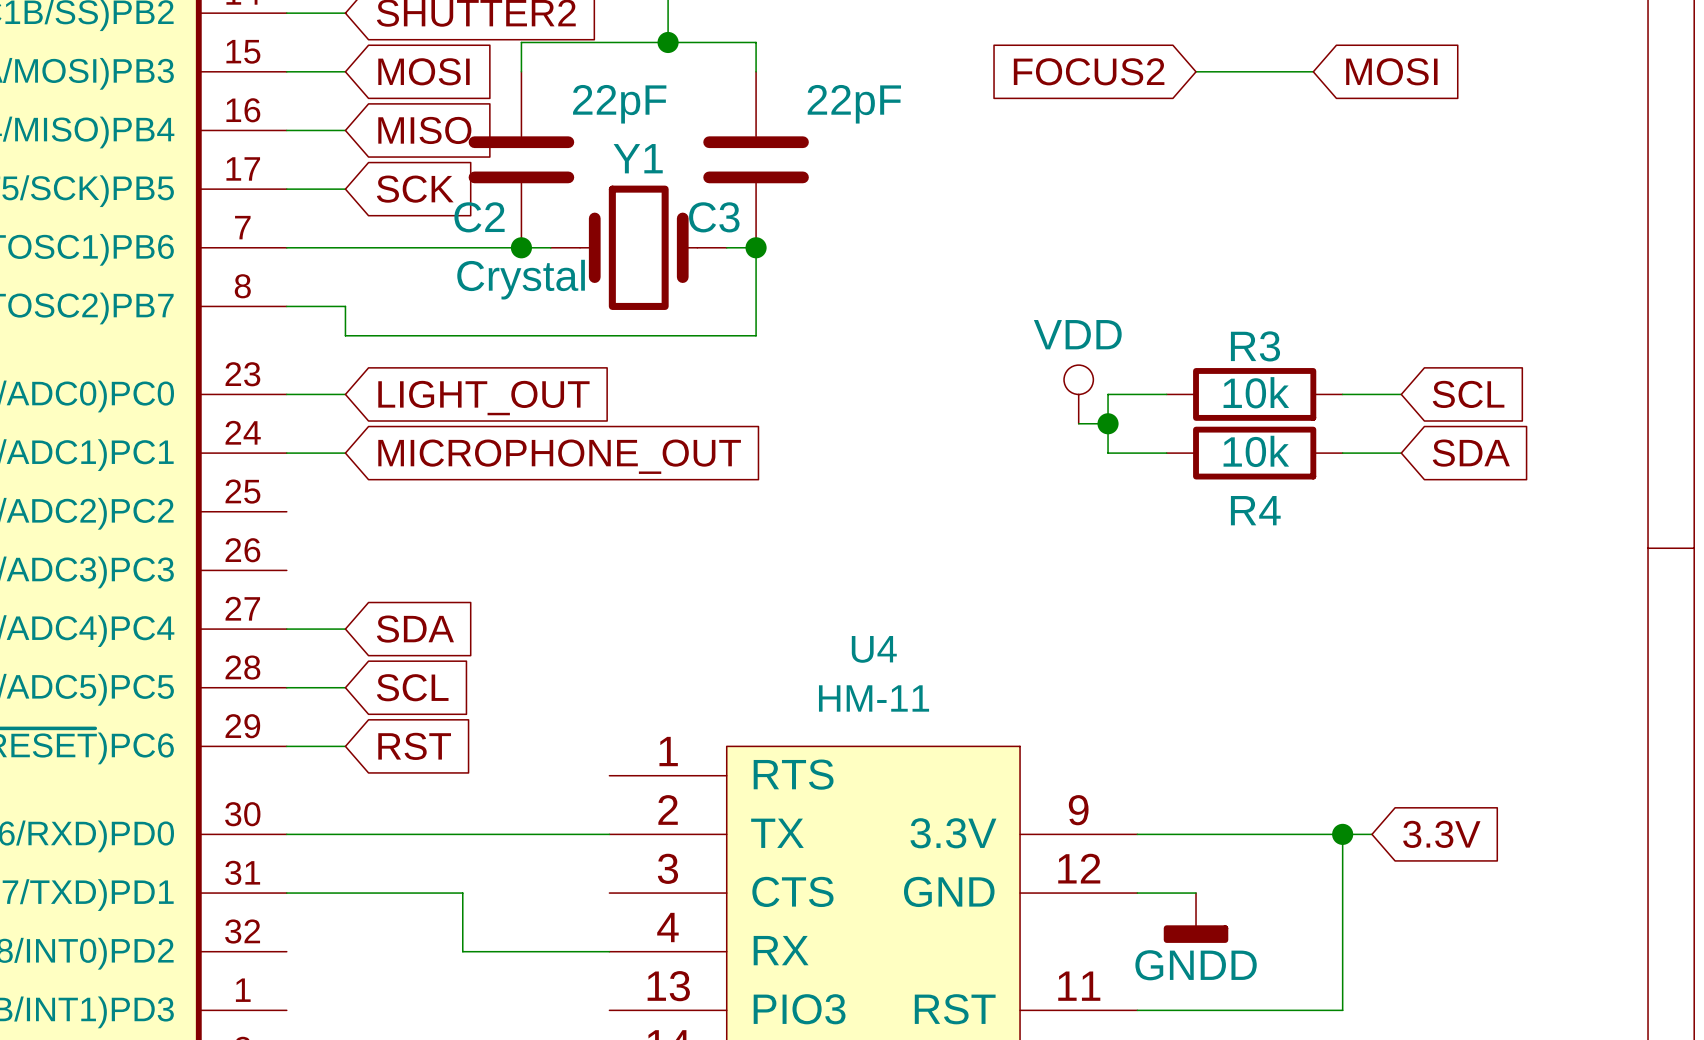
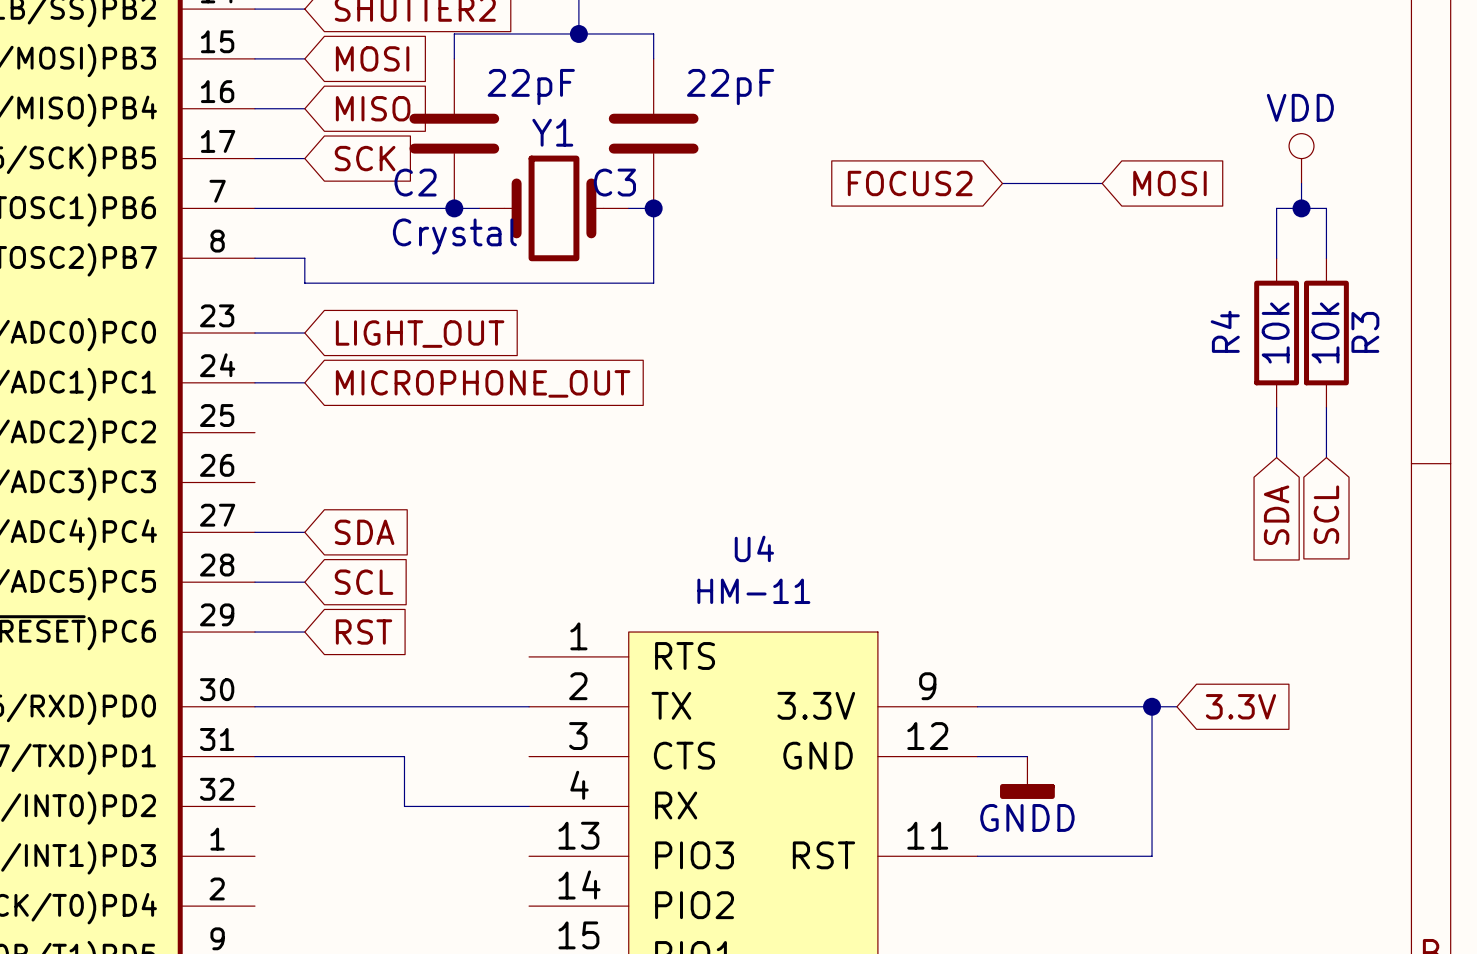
global label position: FOCUS2 (1089, 71) -> FOCUS2 (910, 183)
wire: (1196, 71) (1313, 71) -> (1002, 183) (1102, 183)
global label position: MOSI (1391, 71) -> MOSI (1169, 183)
wire: none -> (1301, 183) (1301, 208)
junction: none -> (1301, 208)
wire: none -> (1276, 258) (1276, 208) (1326, 208) (1326, 258)
power symbol position: VDD (1078, 394) -> VDD (1301, 158)
wire: (1166, 394) (1108, 394) (1108, 453) (1166, 453) -> none
R3 rotation: 0° (1254, 394) -> 90° clockwise (1326, 333)
R3 position: (1254, 394) -> (1326, 333)
wire: (1342, 394) (1401, 394) -> none
global label rotation: 0° (1468, 394) -> 90° clockwise (1326, 514)
global label position: SCL (1468, 394) -> SCL (1326, 514)
wire: (1078, 423) (1108, 423) -> none
junction: (1108, 423) -> none
R4 rotation: 0° (1254, 453) -> 90° clockwise (1276, 333)
R4 position: (1254, 453) -> (1276, 333)
wire: (1342, 453) (1401, 453) -> none
global label rotation: 0° (1471, 453) -> 90° clockwise (1276, 515)
global label position: SDA (1471, 453) -> SDA (1276, 515)
wire: none -> (1276, 407) (1276, 457)
wire: none -> (1326, 407) (1326, 457)

